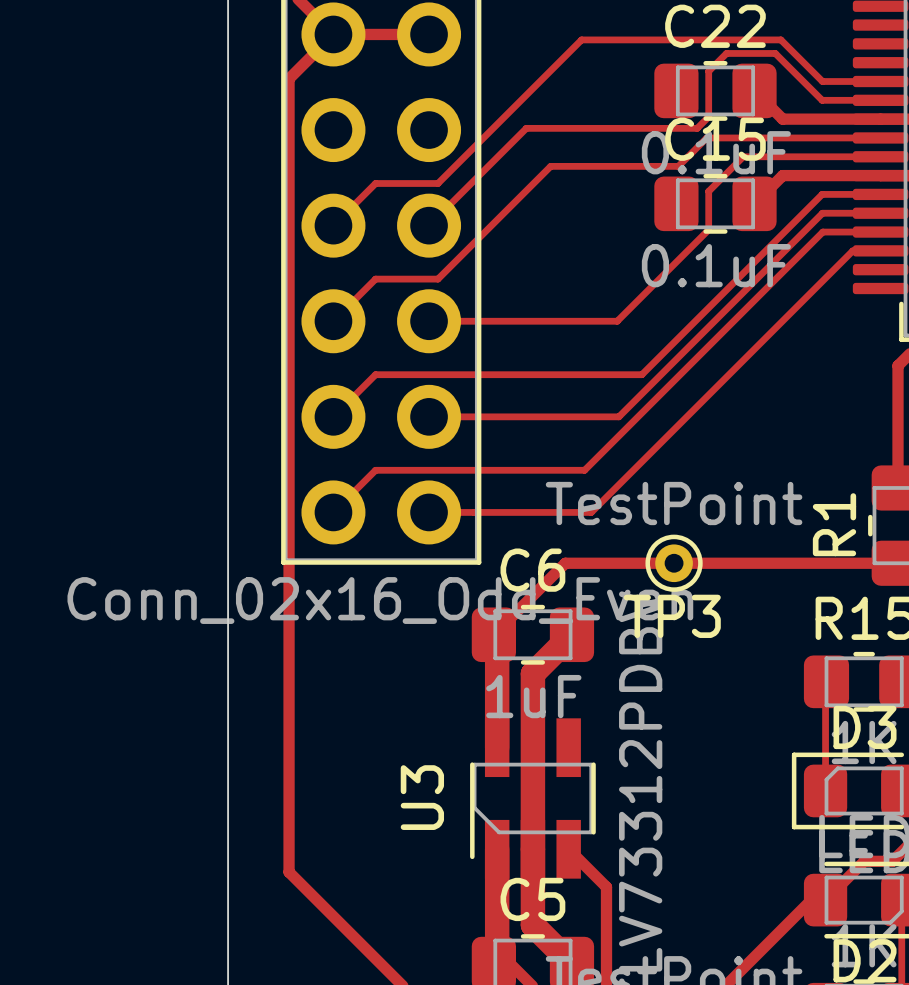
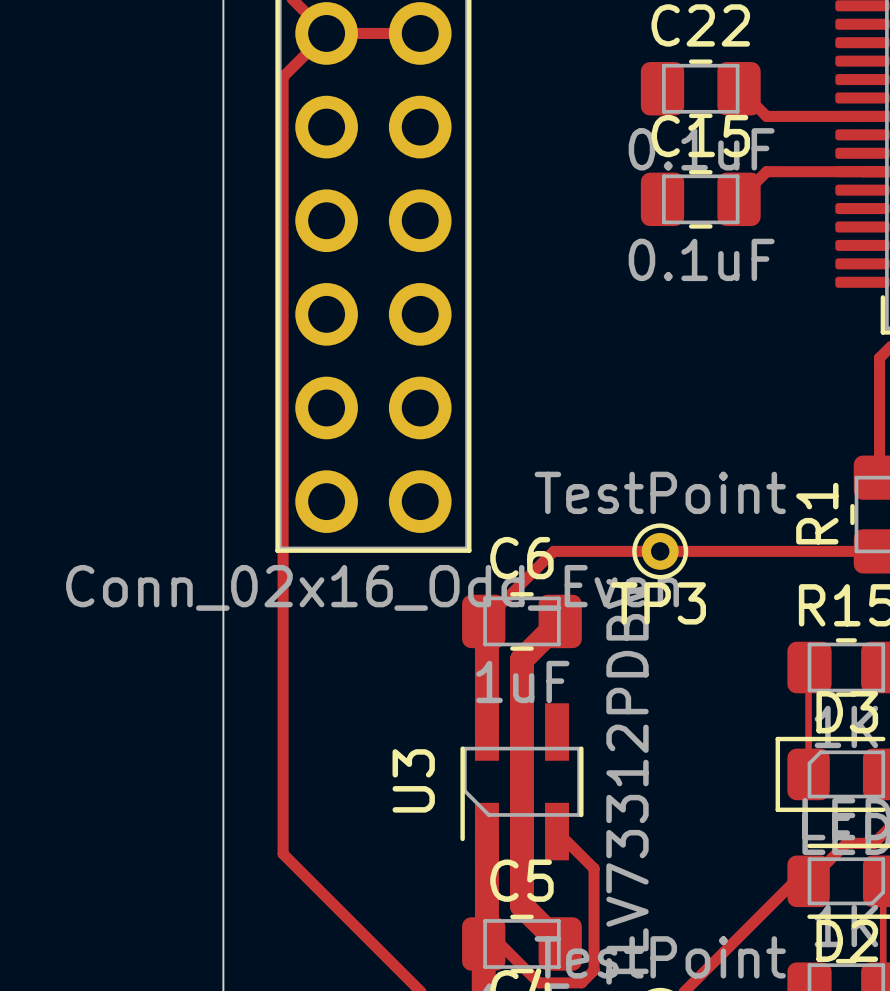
track: (880, 81) (822, 81) (780, 39) (581, 39) (437, 183) (375, 183) (333, 225) -> none
track: (880, 100) (822, 100) (775, 53) (726, 53) (708, 71) (708, 116) (697, 128) (526, 128) (429, 225) -> none
track: (880, 137) (706, 137) (678, 166) (550, 166) (437, 279) (375, 279) (333, 321) -> none
track: (880, 156) (743, 156) (708, 191) (708, 229) (617, 321) (429, 321) -> none
track: (880, 194) (822, 194) (641, 374) (375, 374) (333, 416) -> none
track: (880, 213) (822, 213) (618, 416) (429, 416) -> none
track: (880, 232) (822, 232) (584, 470) (375, 470) (333, 512) -> none
track: (880, 250) (852, 250) (591, 512) (429, 512) -> none

